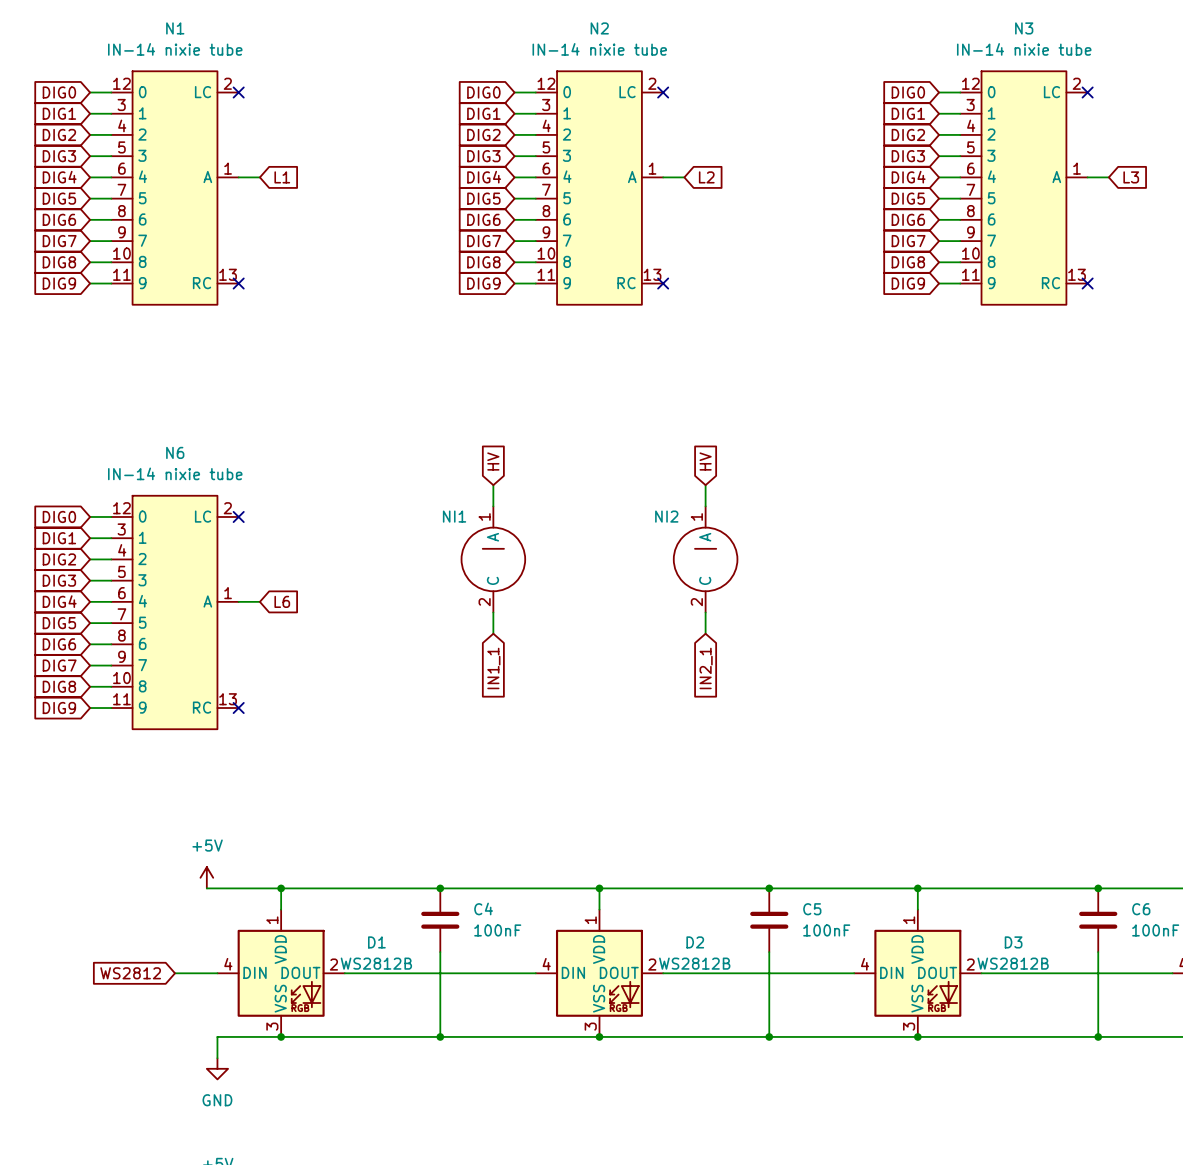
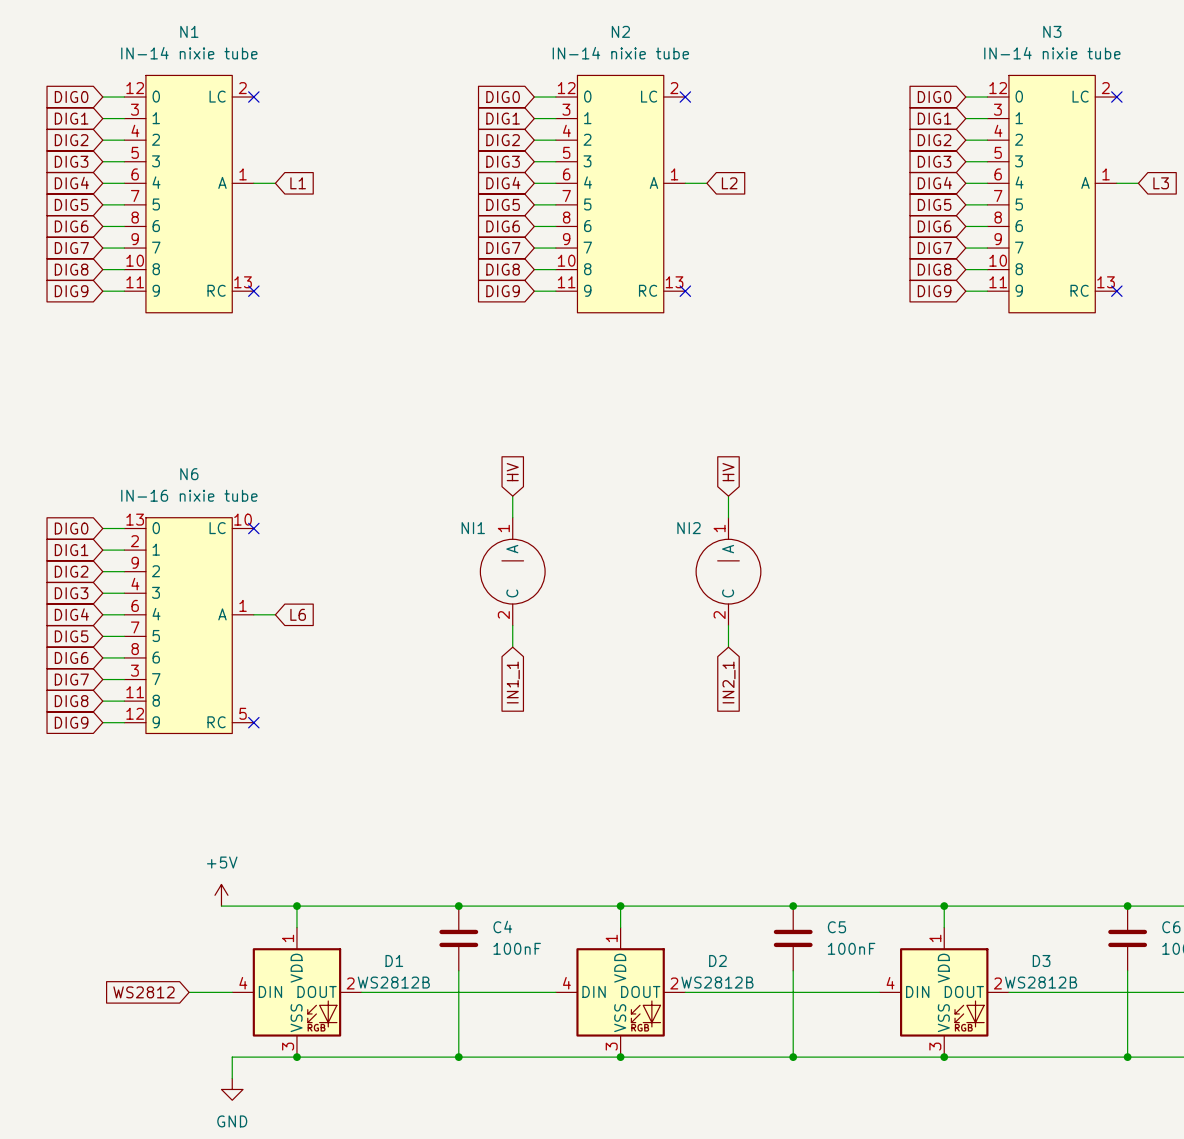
N6 value: IN-14 nixie tube (175, 473) -> IN-16 nixie tube (189, 495)
N6 symbol: [111, 495, 239, 730] -> [124, 517, 254, 734]

